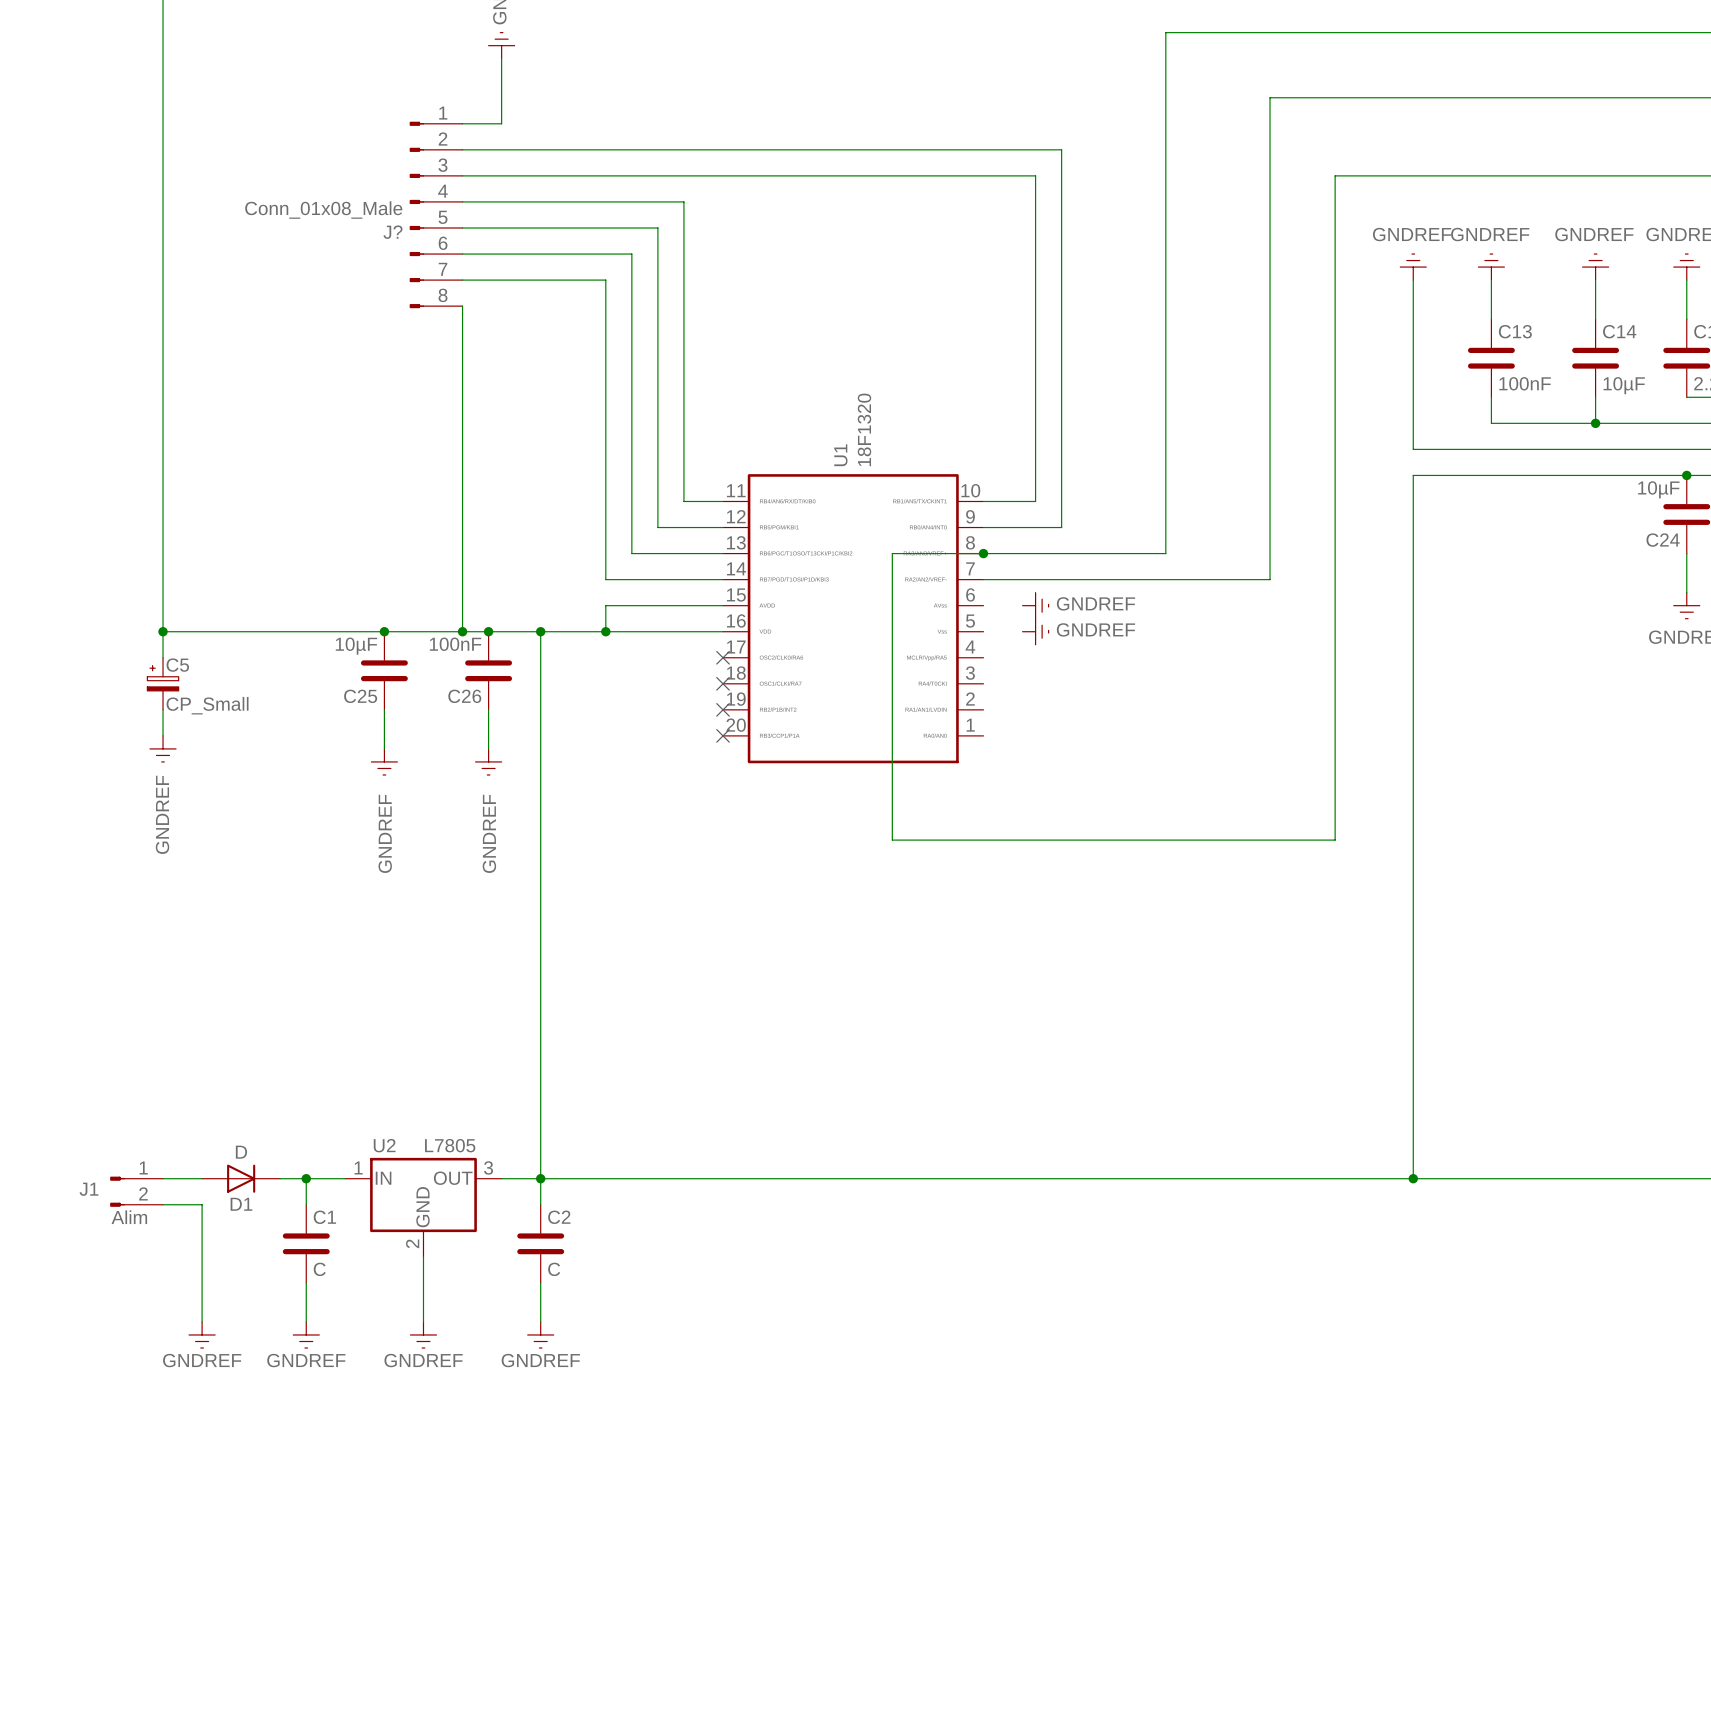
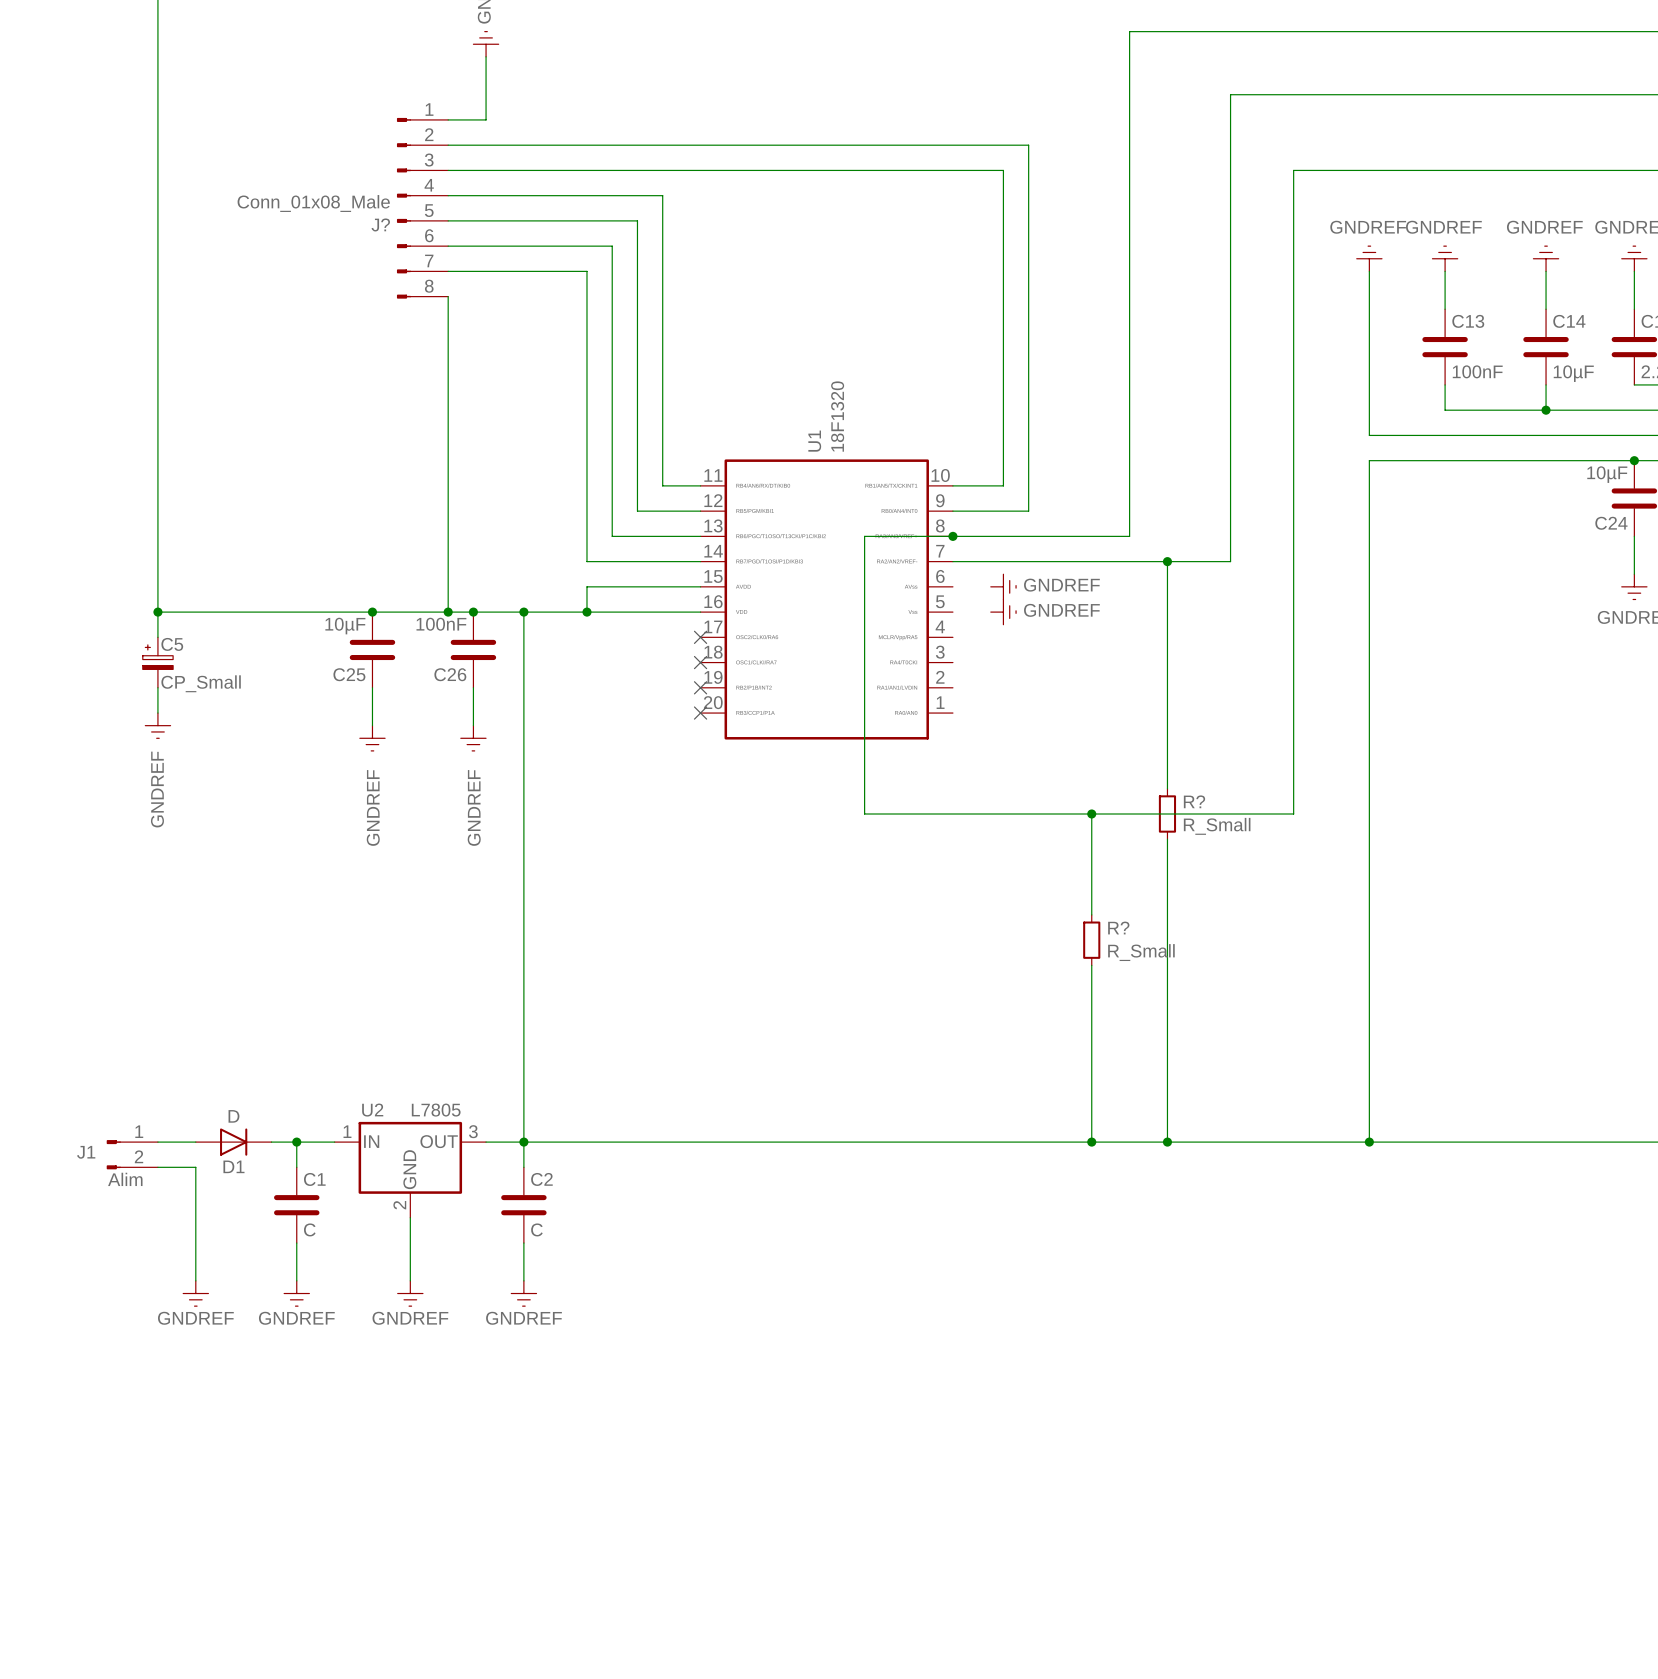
wire: none -> (1167, 561) (1167, 788)
junction: none -> (1167, 561)
wire: none -> (1091, 813) (1091, 914)
junction: none -> (1091, 813)
R?: none -> R_Small (1167, 813)
wire: none -> (1167, 839) (1167, 1142)
R?: none -> R_Small (1091, 940)
wire: none -> (1091, 965) (1091, 1142)
junction: none -> (1091, 1142)
junction: none -> (1167, 1142)

